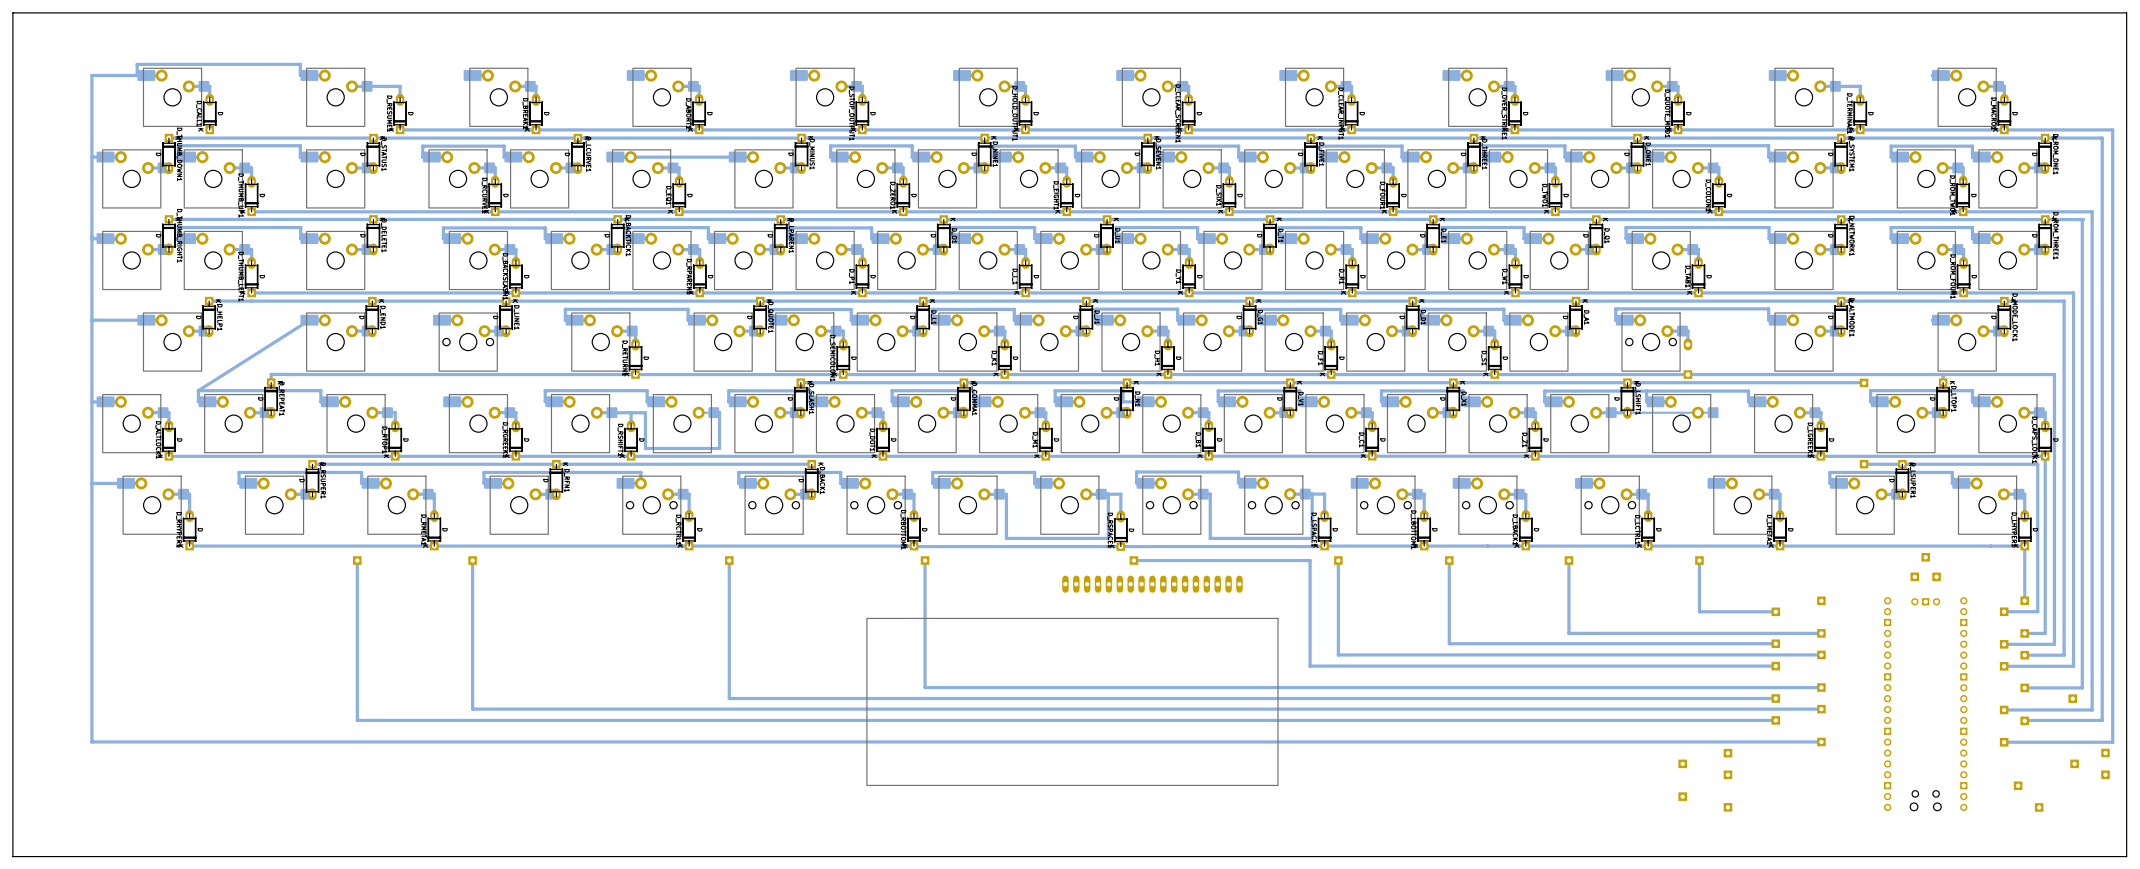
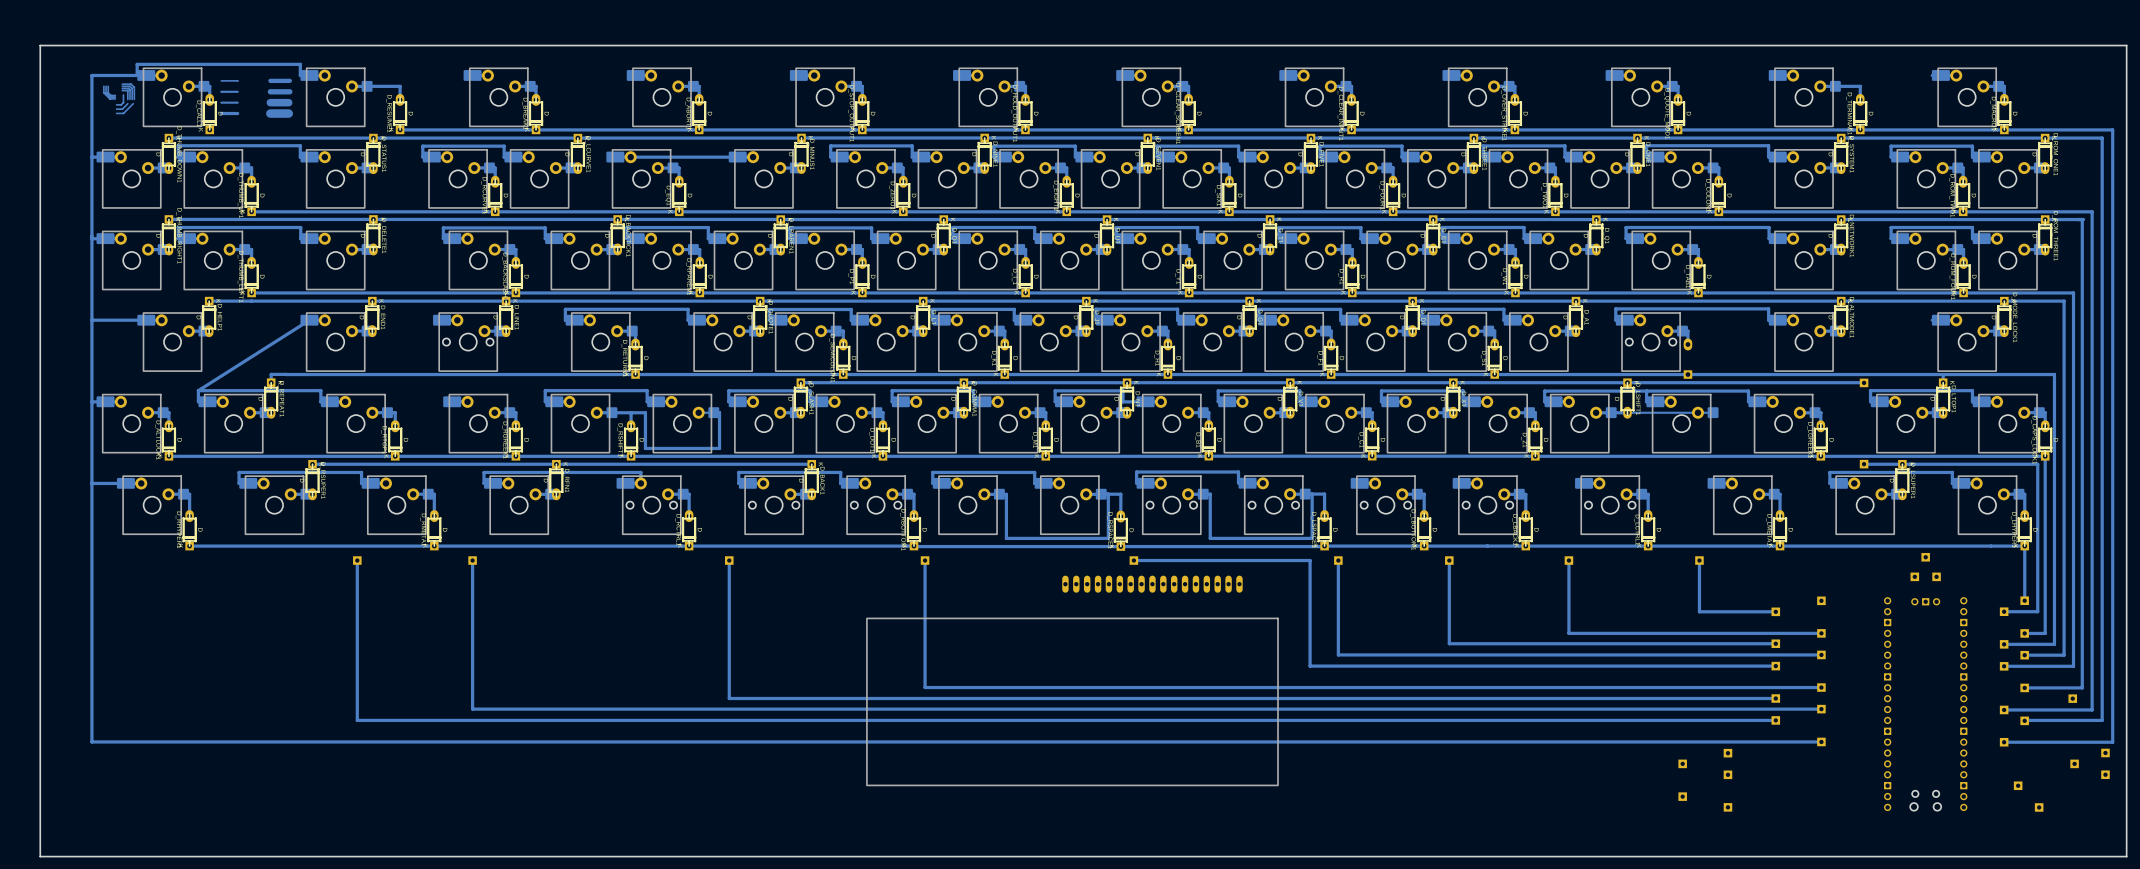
board edge: (2126, 45) (2126, 12) (12, 12) (12, 856) (40, 856) -> (2126, 45) (40, 45) (40, 856)
track: none -> (237, 80) (221, 80)
track: none -> (289, 80) (270, 80)
track: none -> (122, 84) (131, 84) (134, 87) (134, 99)
track: none -> (103, 86) (103, 92) (109, 98) (115, 98)
track: none -> (106, 86) (106, 92) (110, 97) (115, 97)
track: none -> (108, 86) (108, 92) (110, 95) (115, 95)
track: none -> (122, 86) (130, 86) (132, 88) (132, 99)
track: none -> (122, 88) (129, 89) (129, 99)
track: none -> (127, 90) (122, 90)
track: none -> (127, 90) (127, 99)
track: none -> (237, 91) (221, 91)
track: none -> (289, 91) (270, 91)
track: none -> (123, 95) (123, 102) (116, 104)
track: none -> (237, 102) (221, 102)
track: none -> (288, 102) (270, 102)
track: none -> (127, 103) (122, 109) (116, 109)
track: none -> (133, 103) (123, 113) (116, 113)
track: none -> (237, 113) (221, 113)
track: none -> (288, 113) (270, 113)

